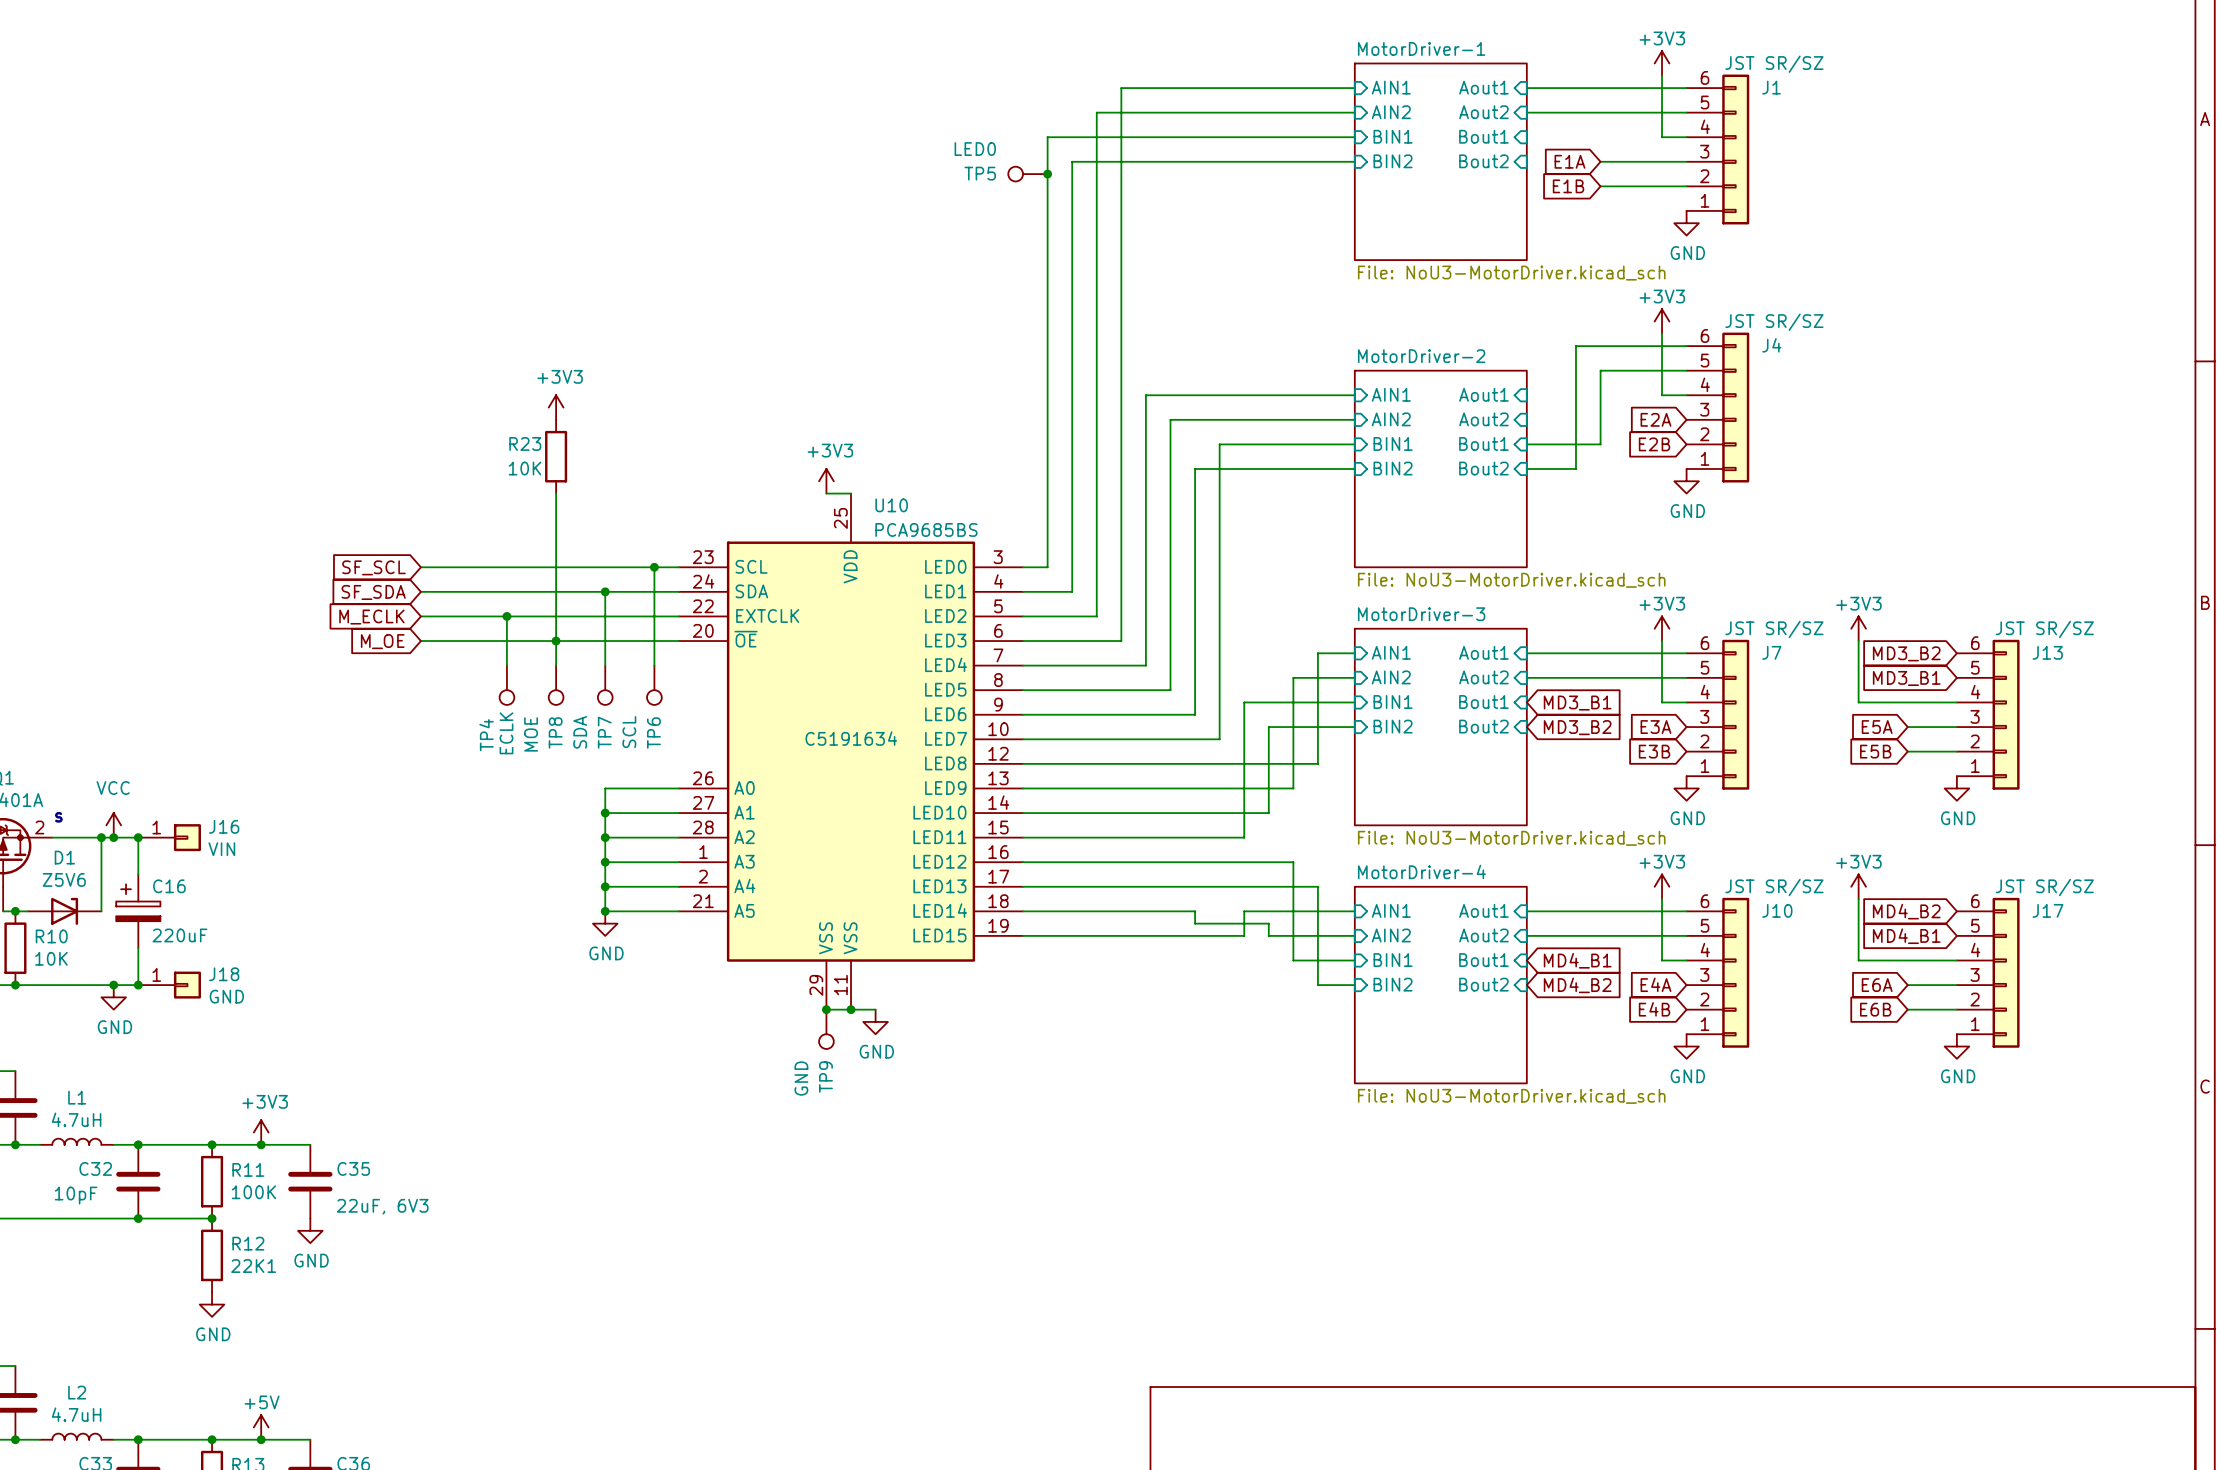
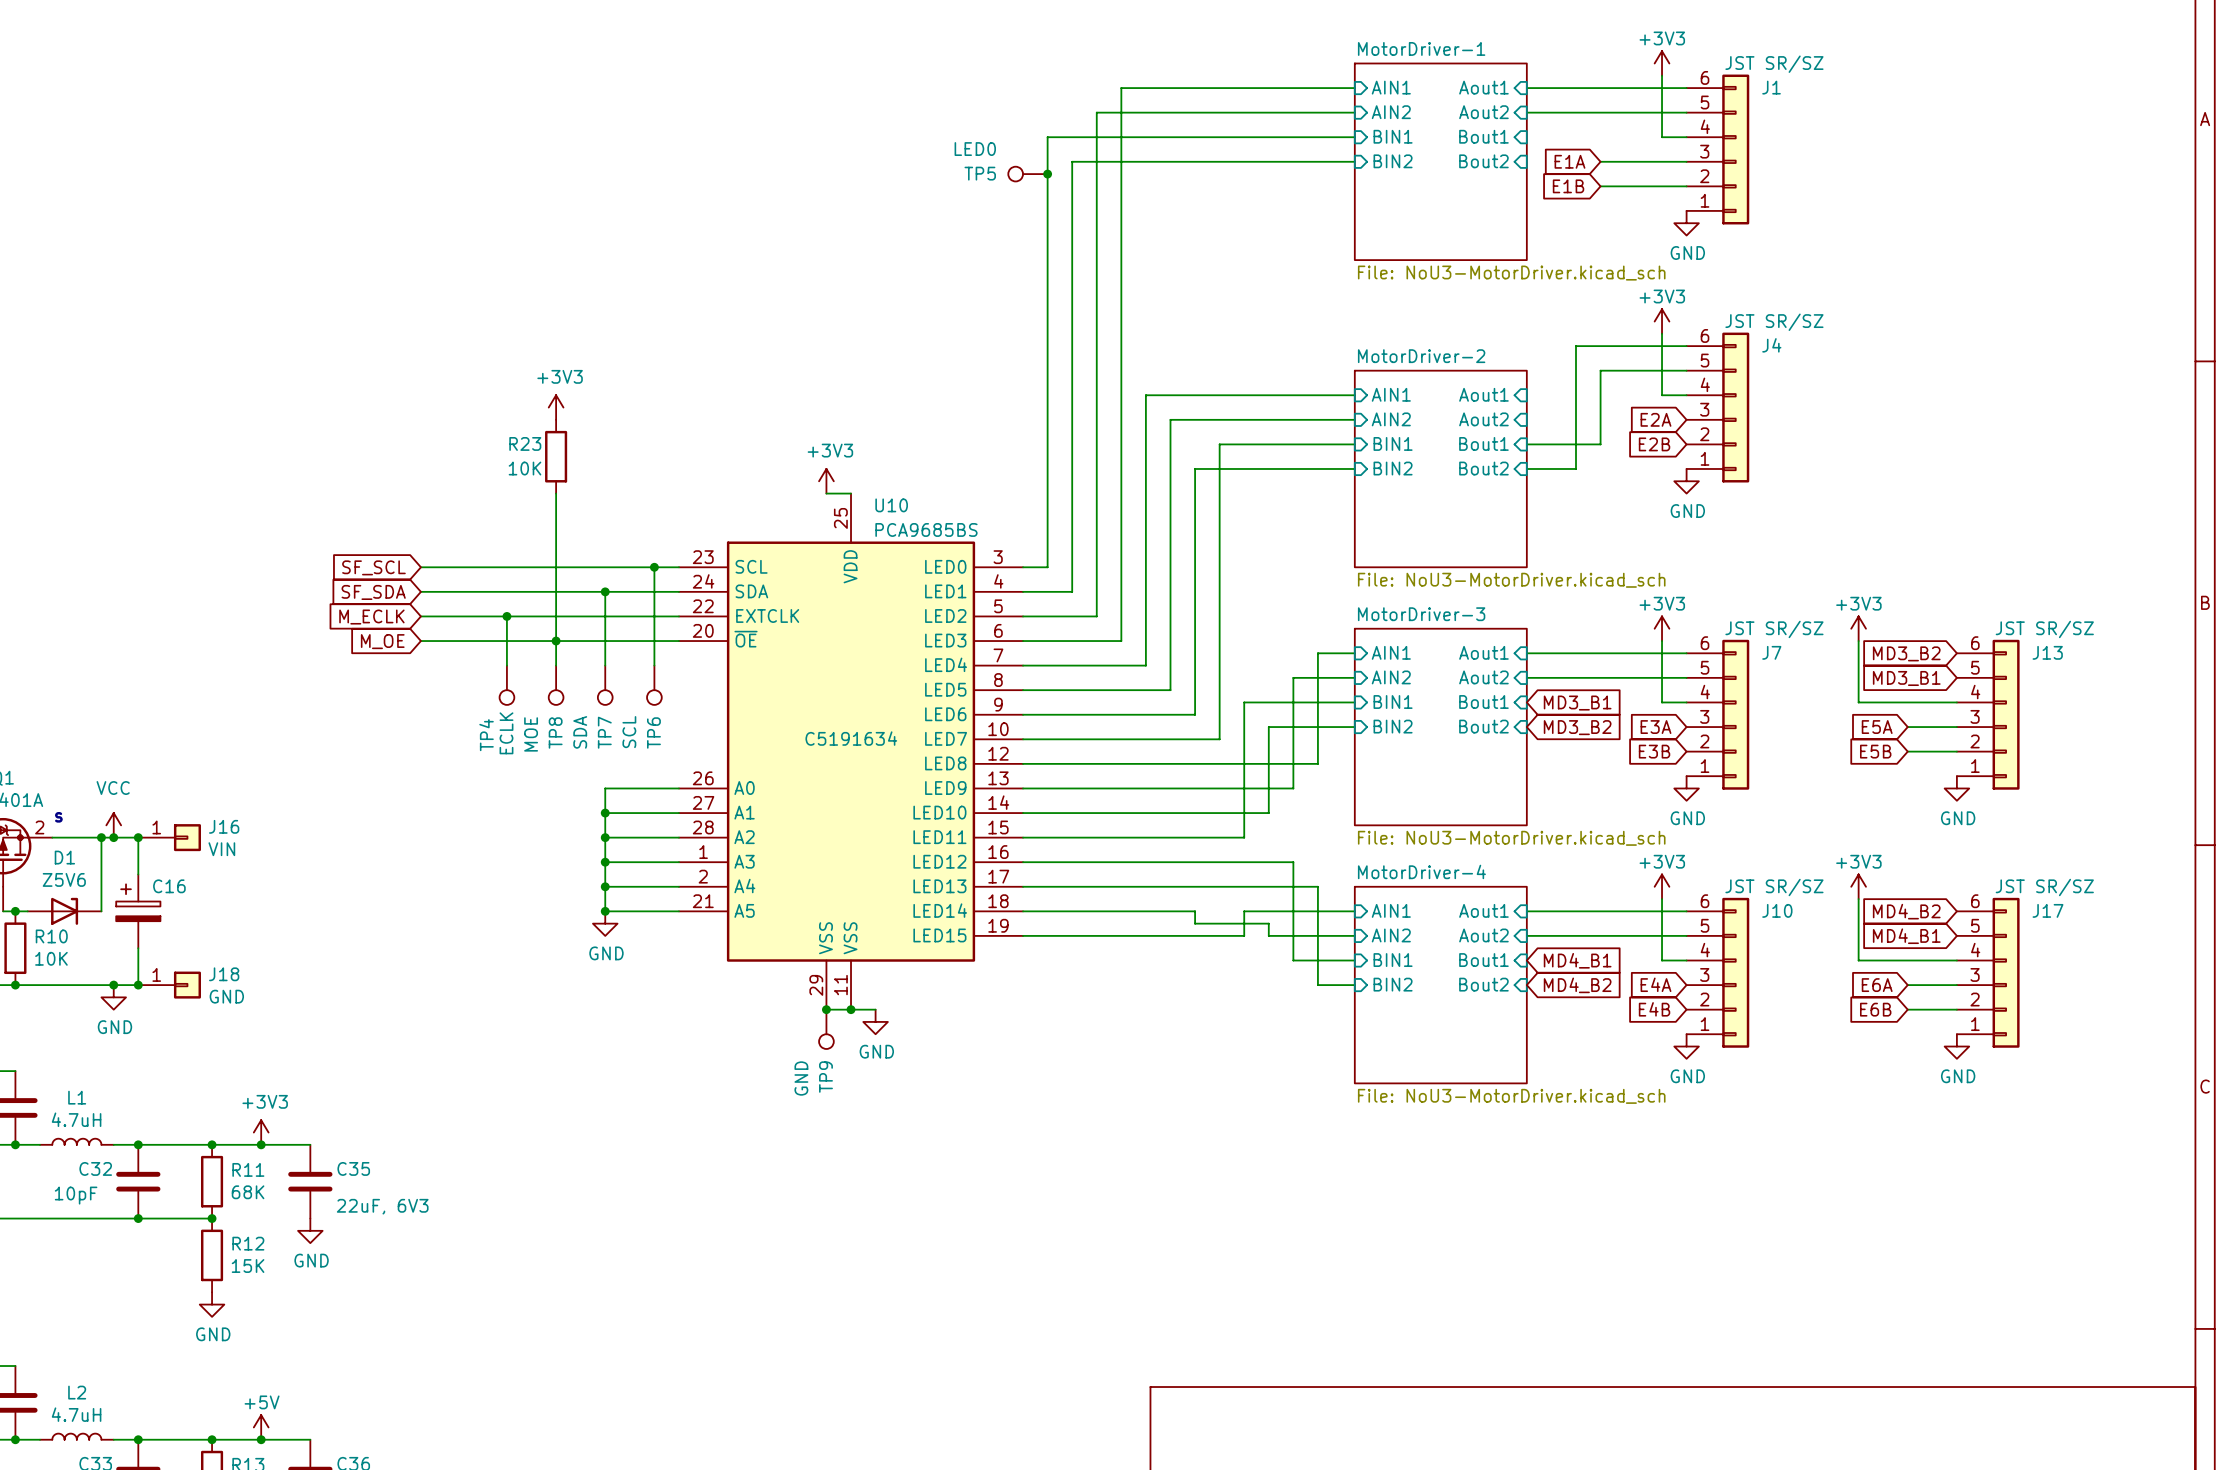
C16 value: 220uF (179, 935) -> none
R11 value: 100K (253, 1192) -> 68K (248, 1192)
R12 value: 22K1 (253, 1266) -> 15K (248, 1266)

